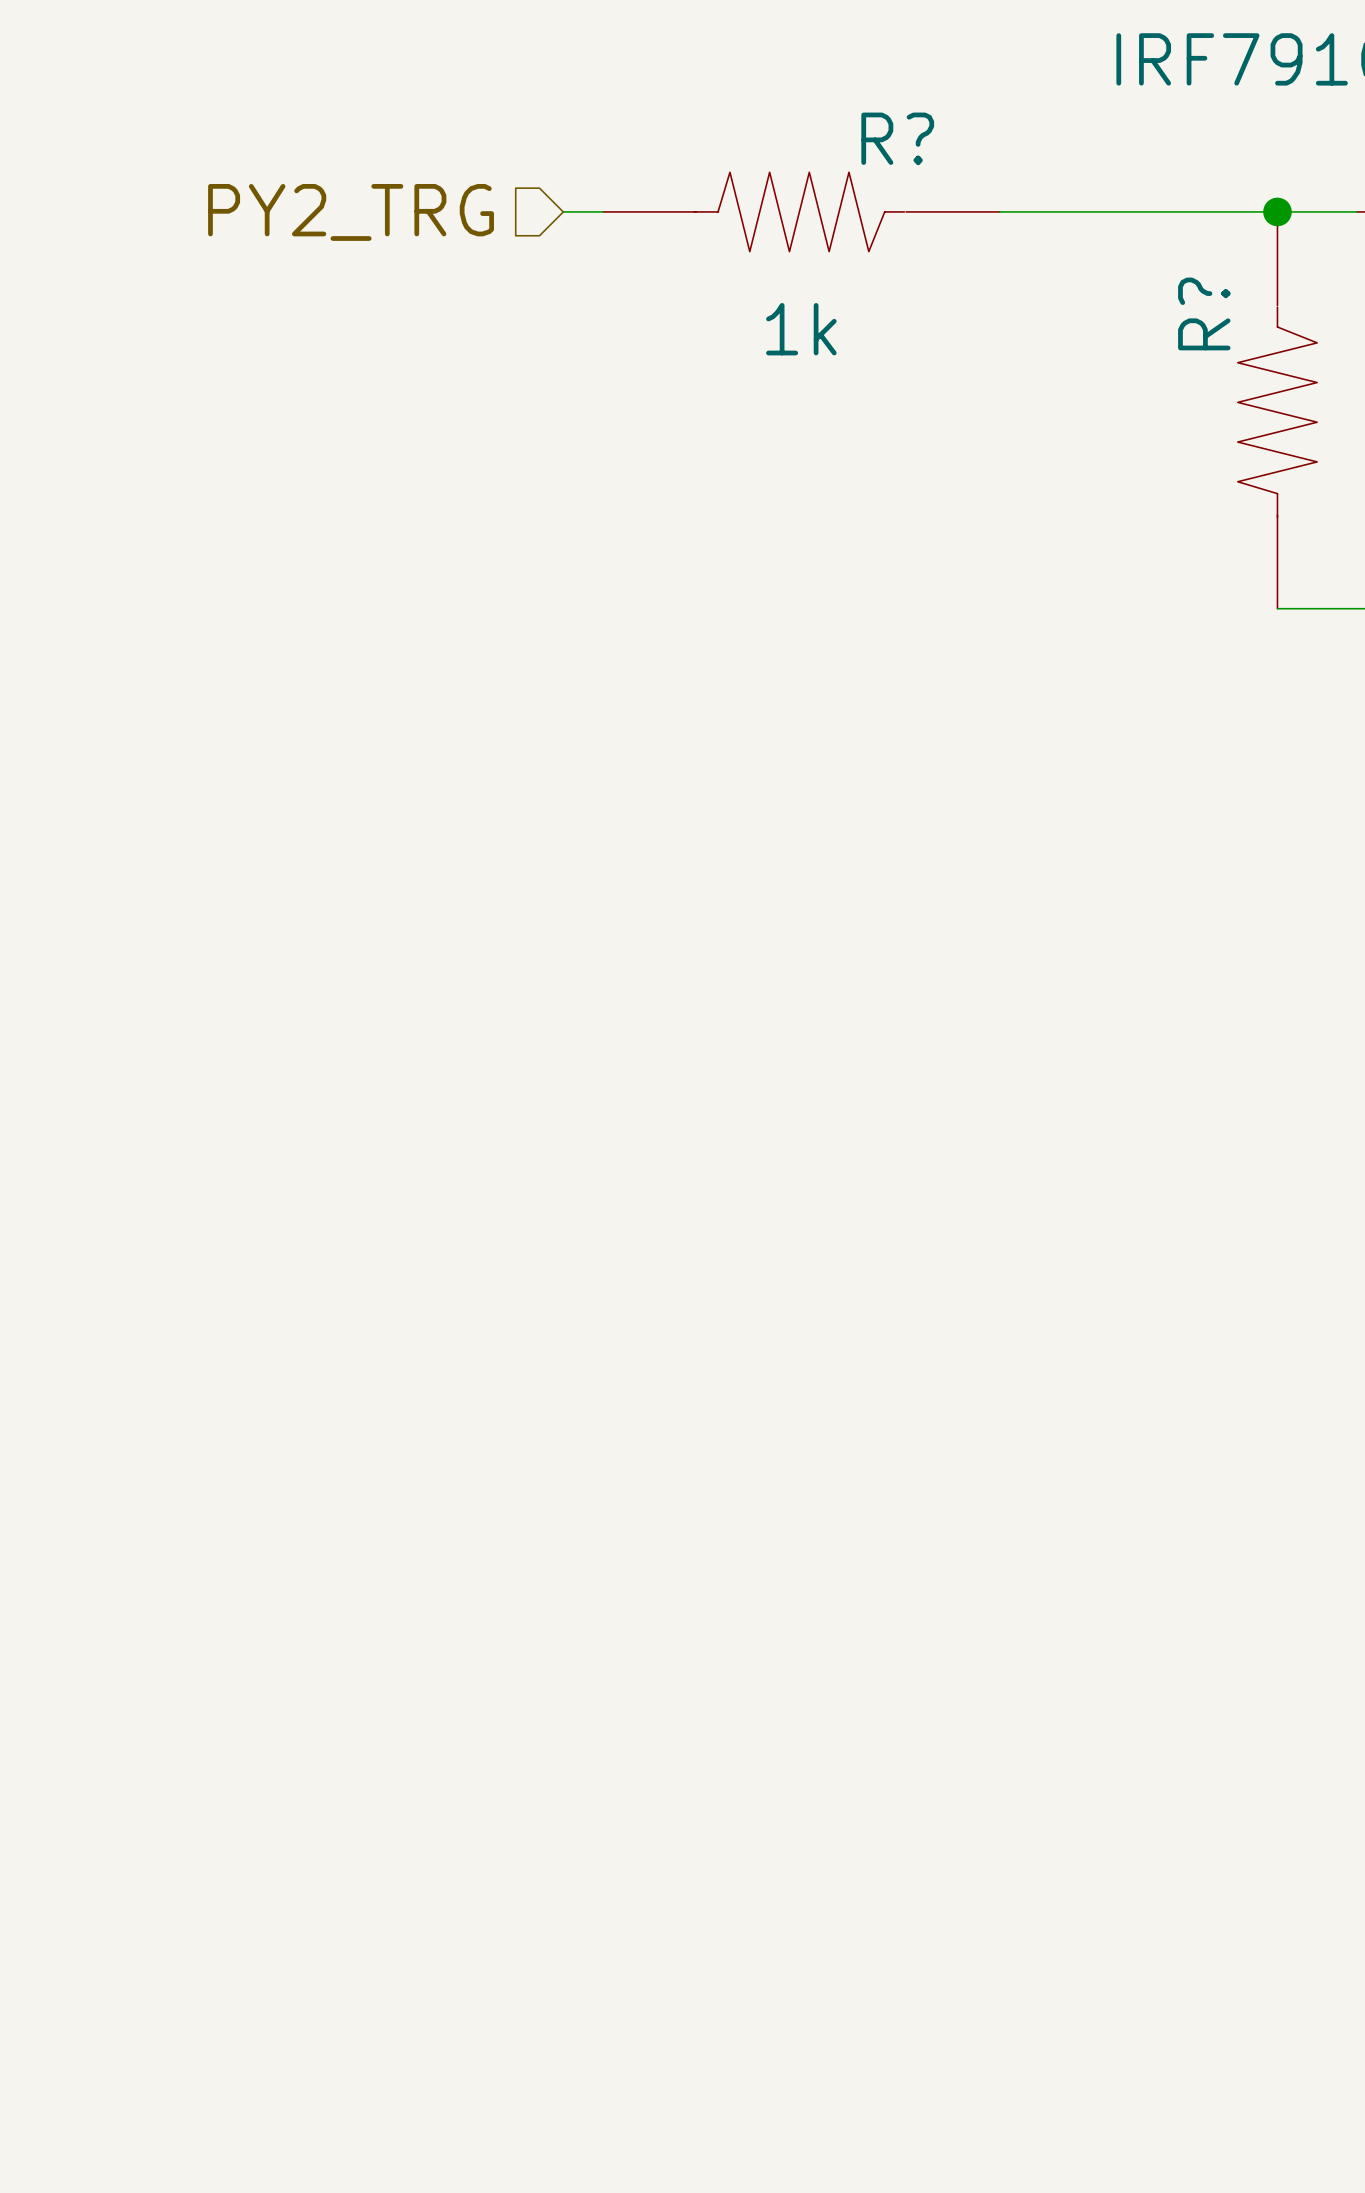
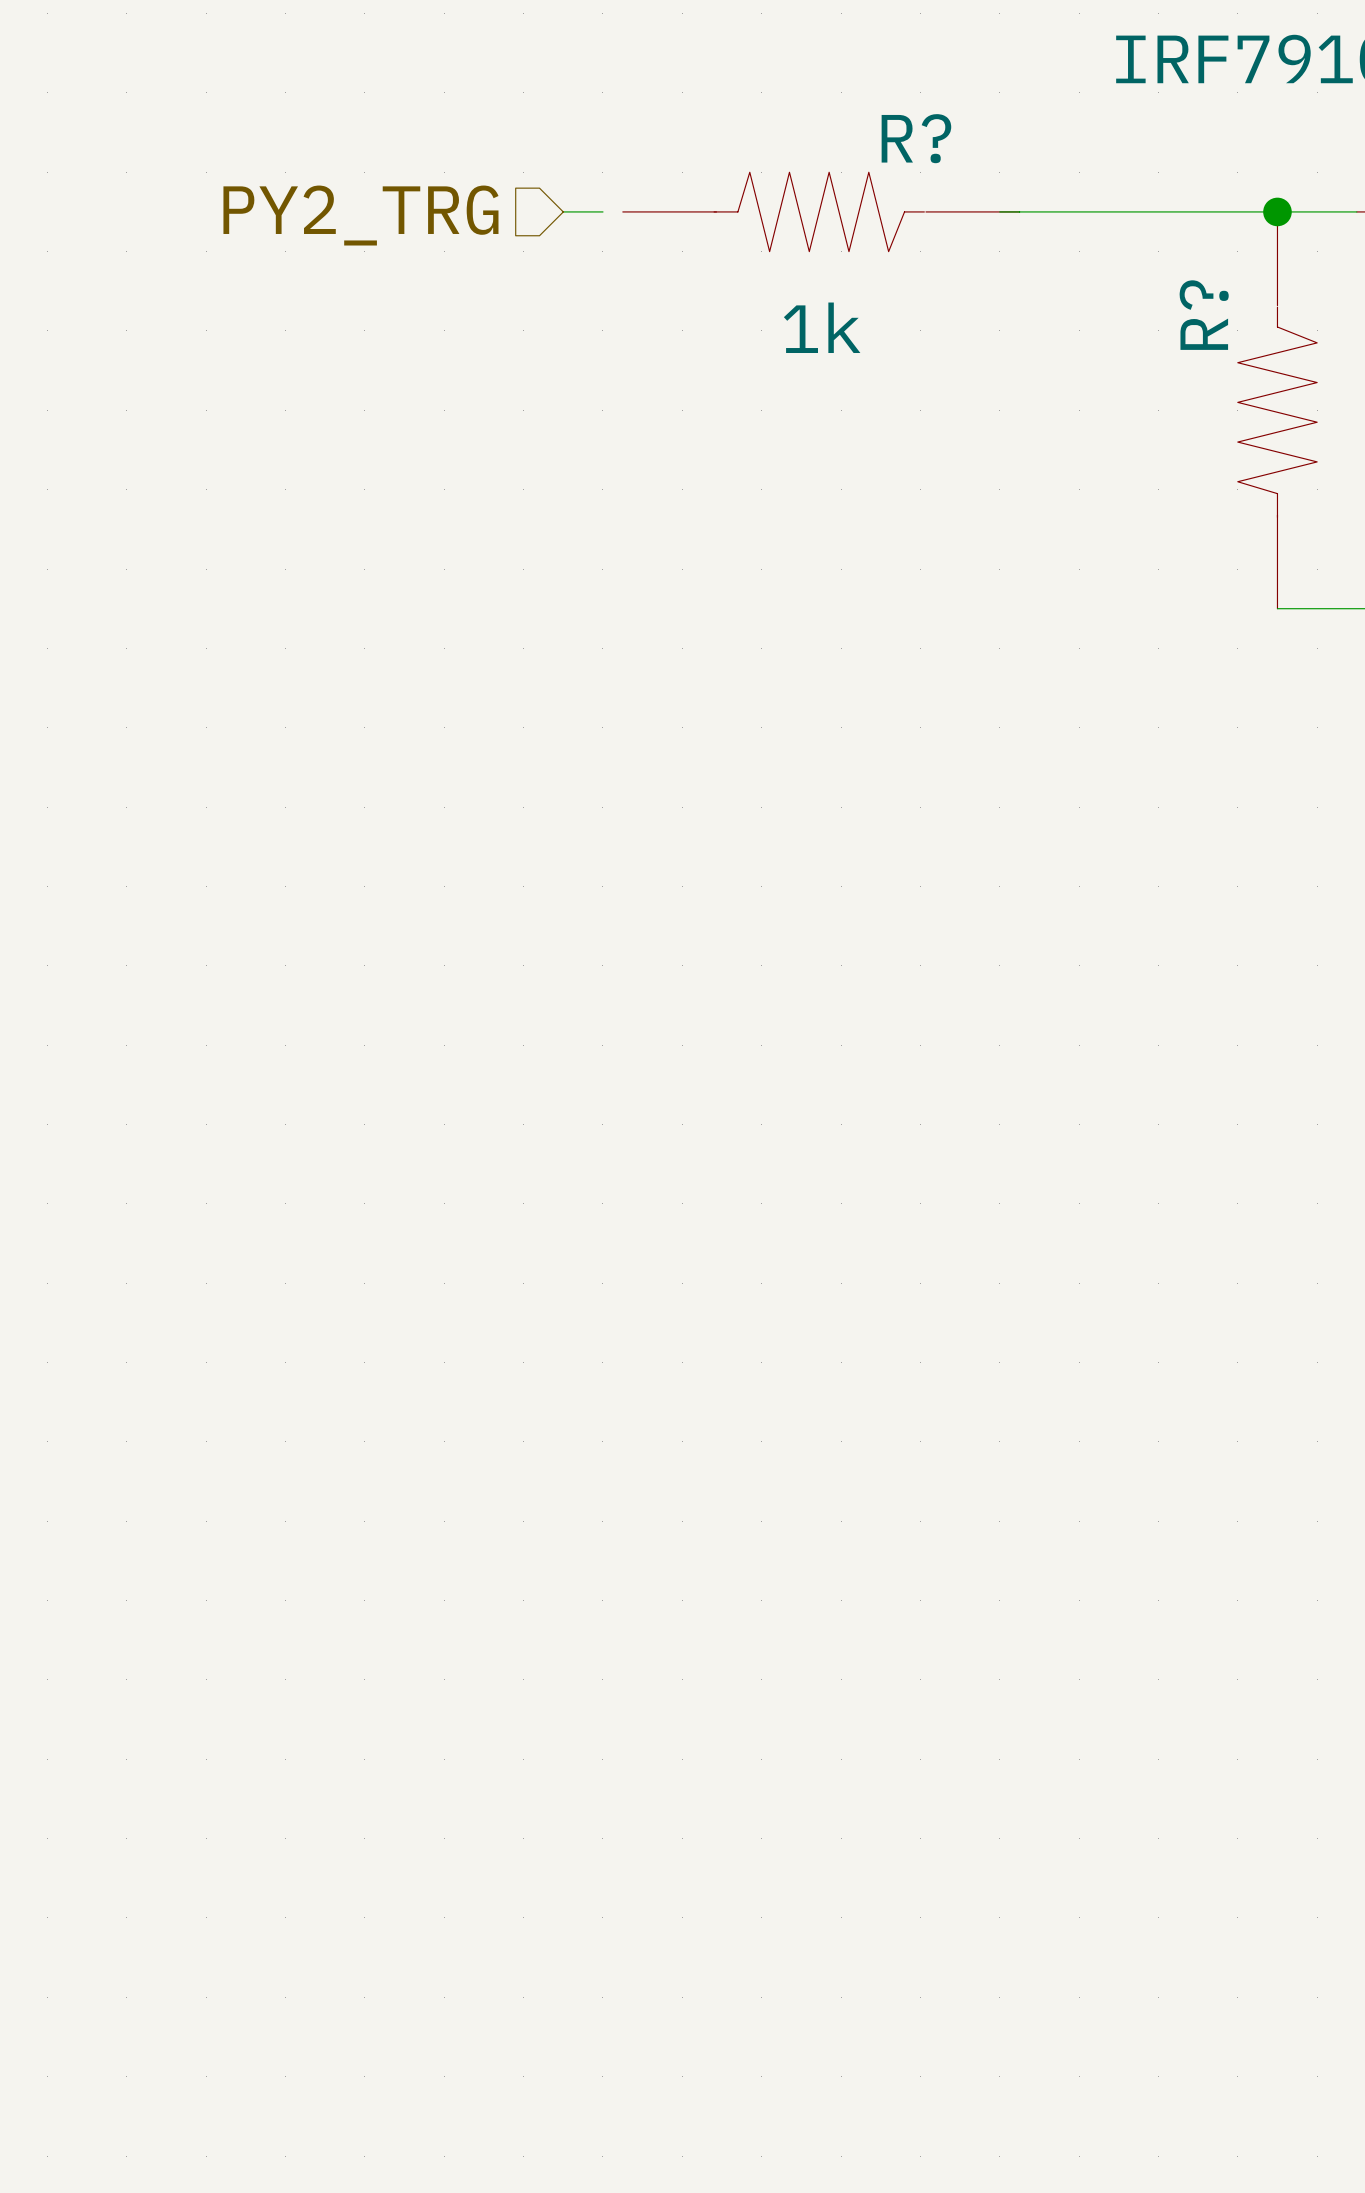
R? position: (801, 211) -> (821, 211)

